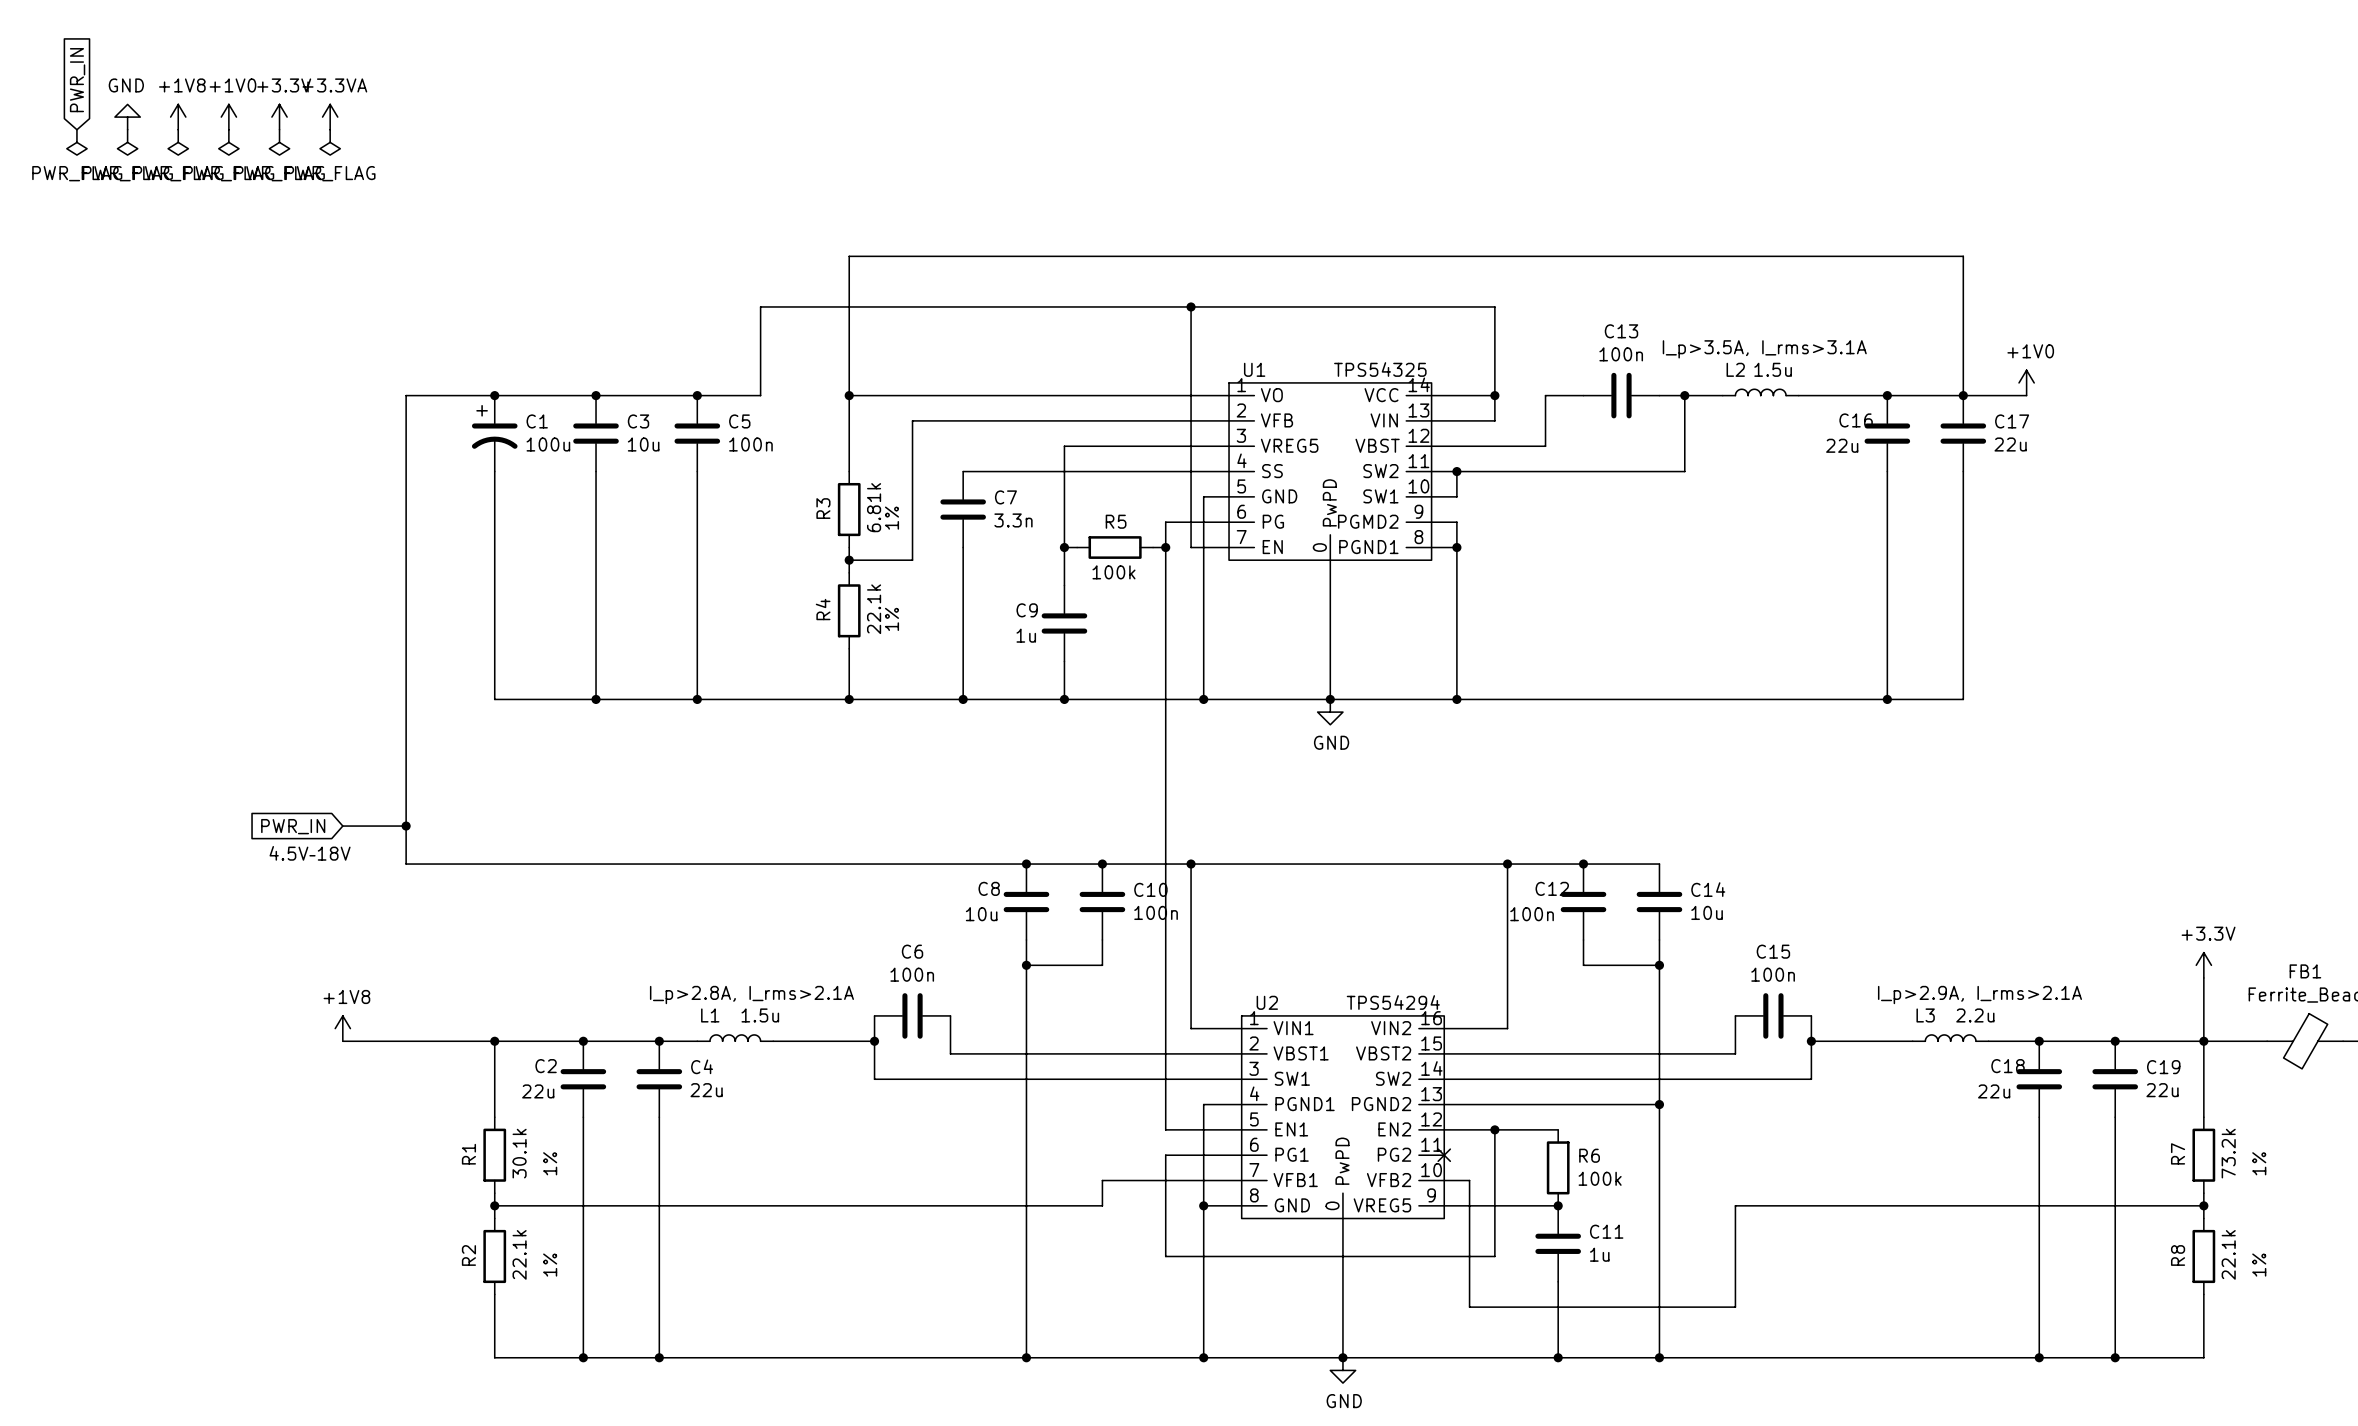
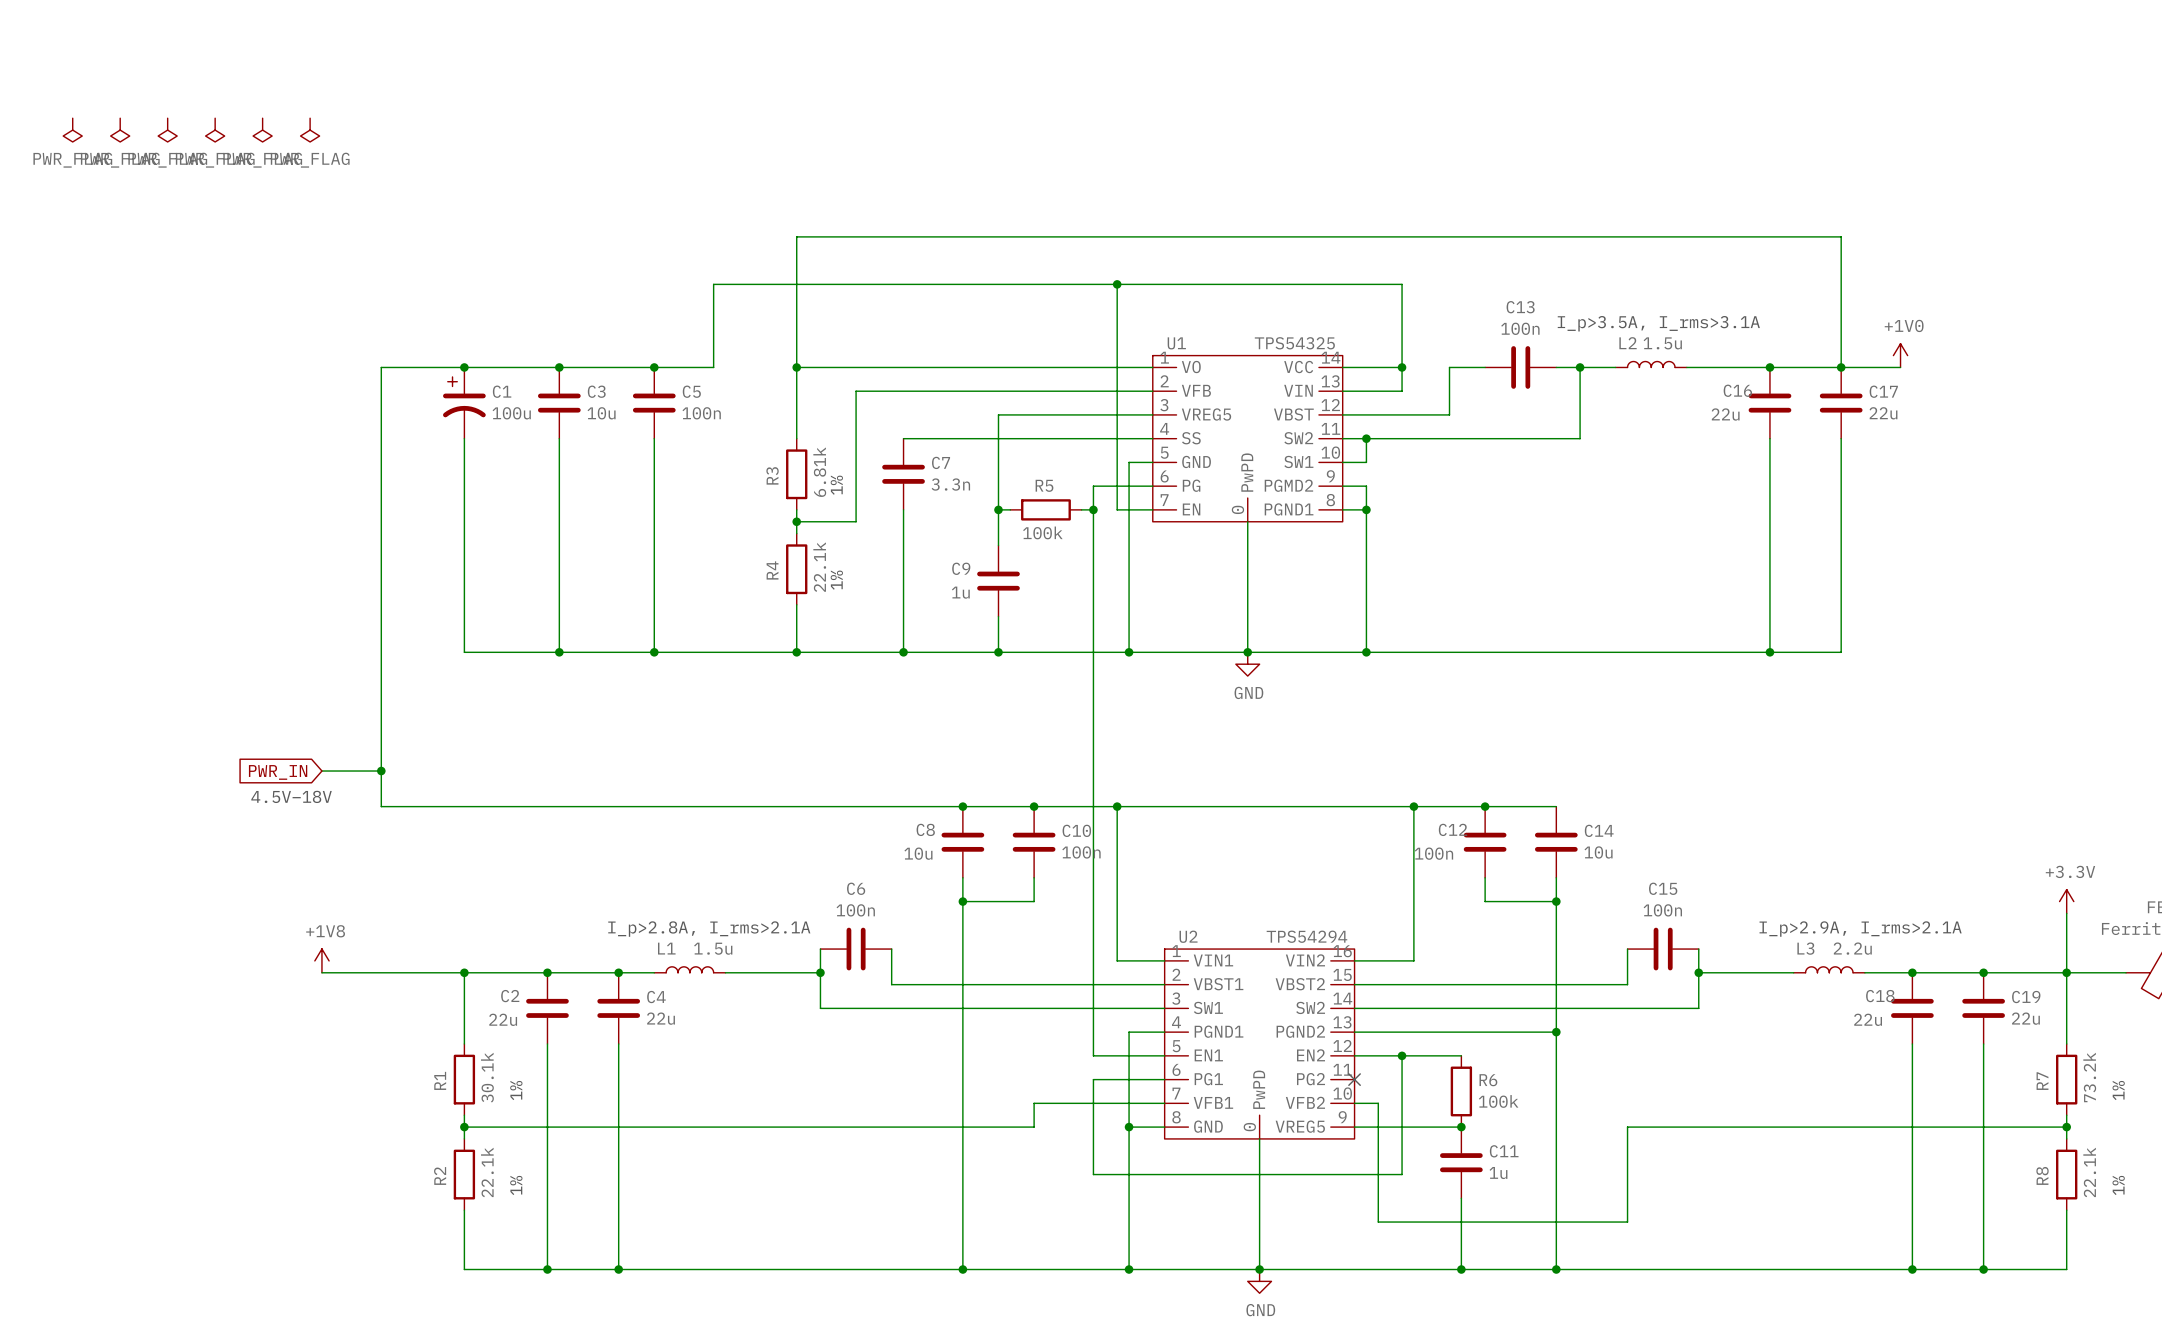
global label: PWR_IN (77, 80) -> none
power symbol: GND (127, 117) -> none
power symbol: +1V8 (178, 117) -> none
power symbol: +1V0 (228, 117) -> none
power symbol: +3.3V (279, 117) -> none
power symbol: +3.3VA (330, 117) -> none

